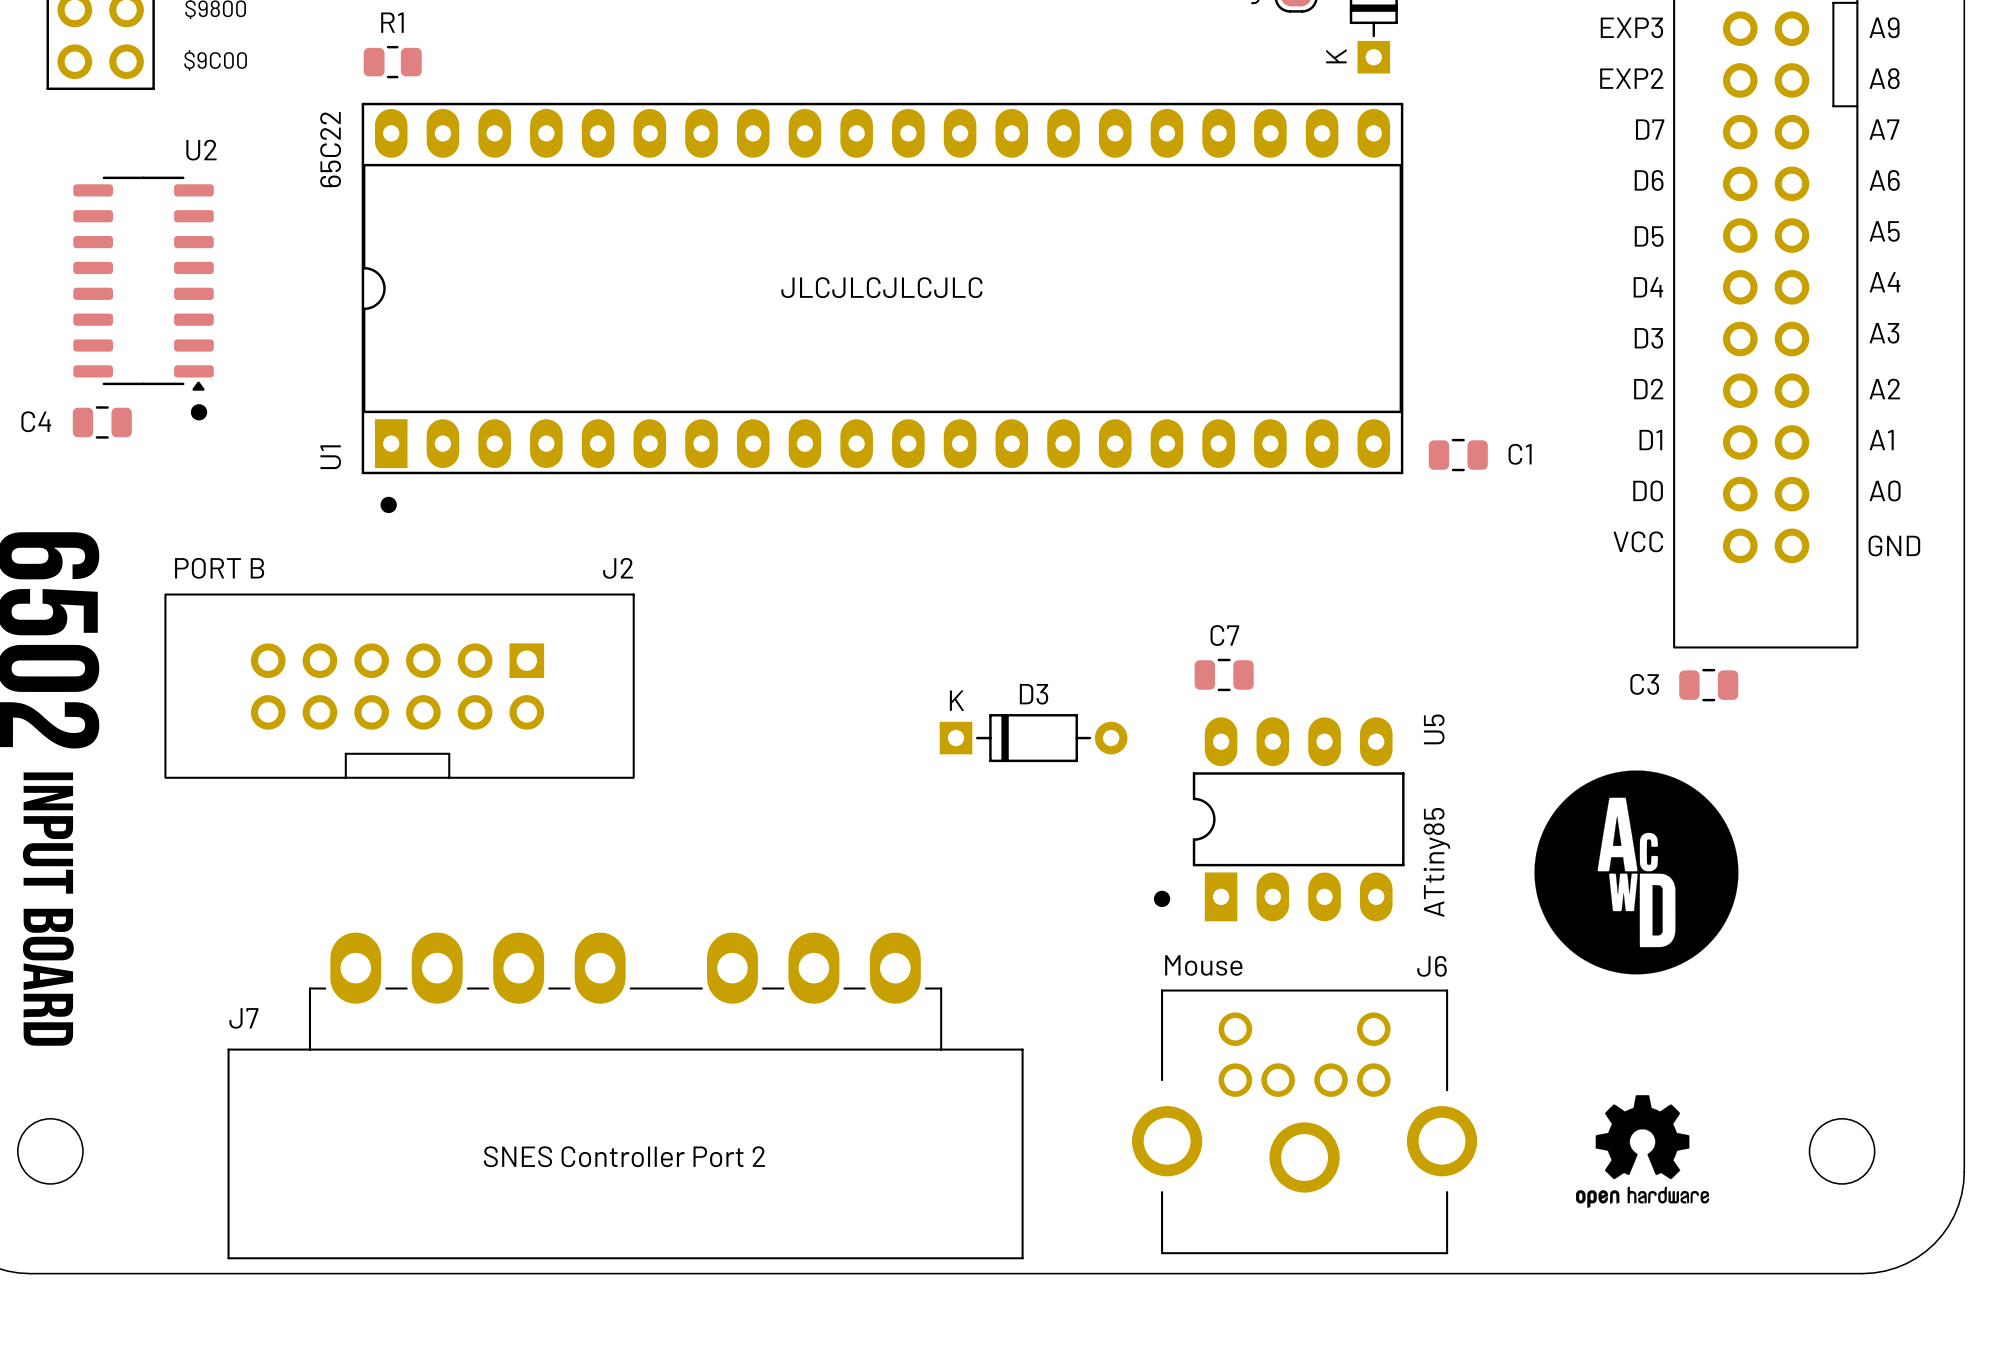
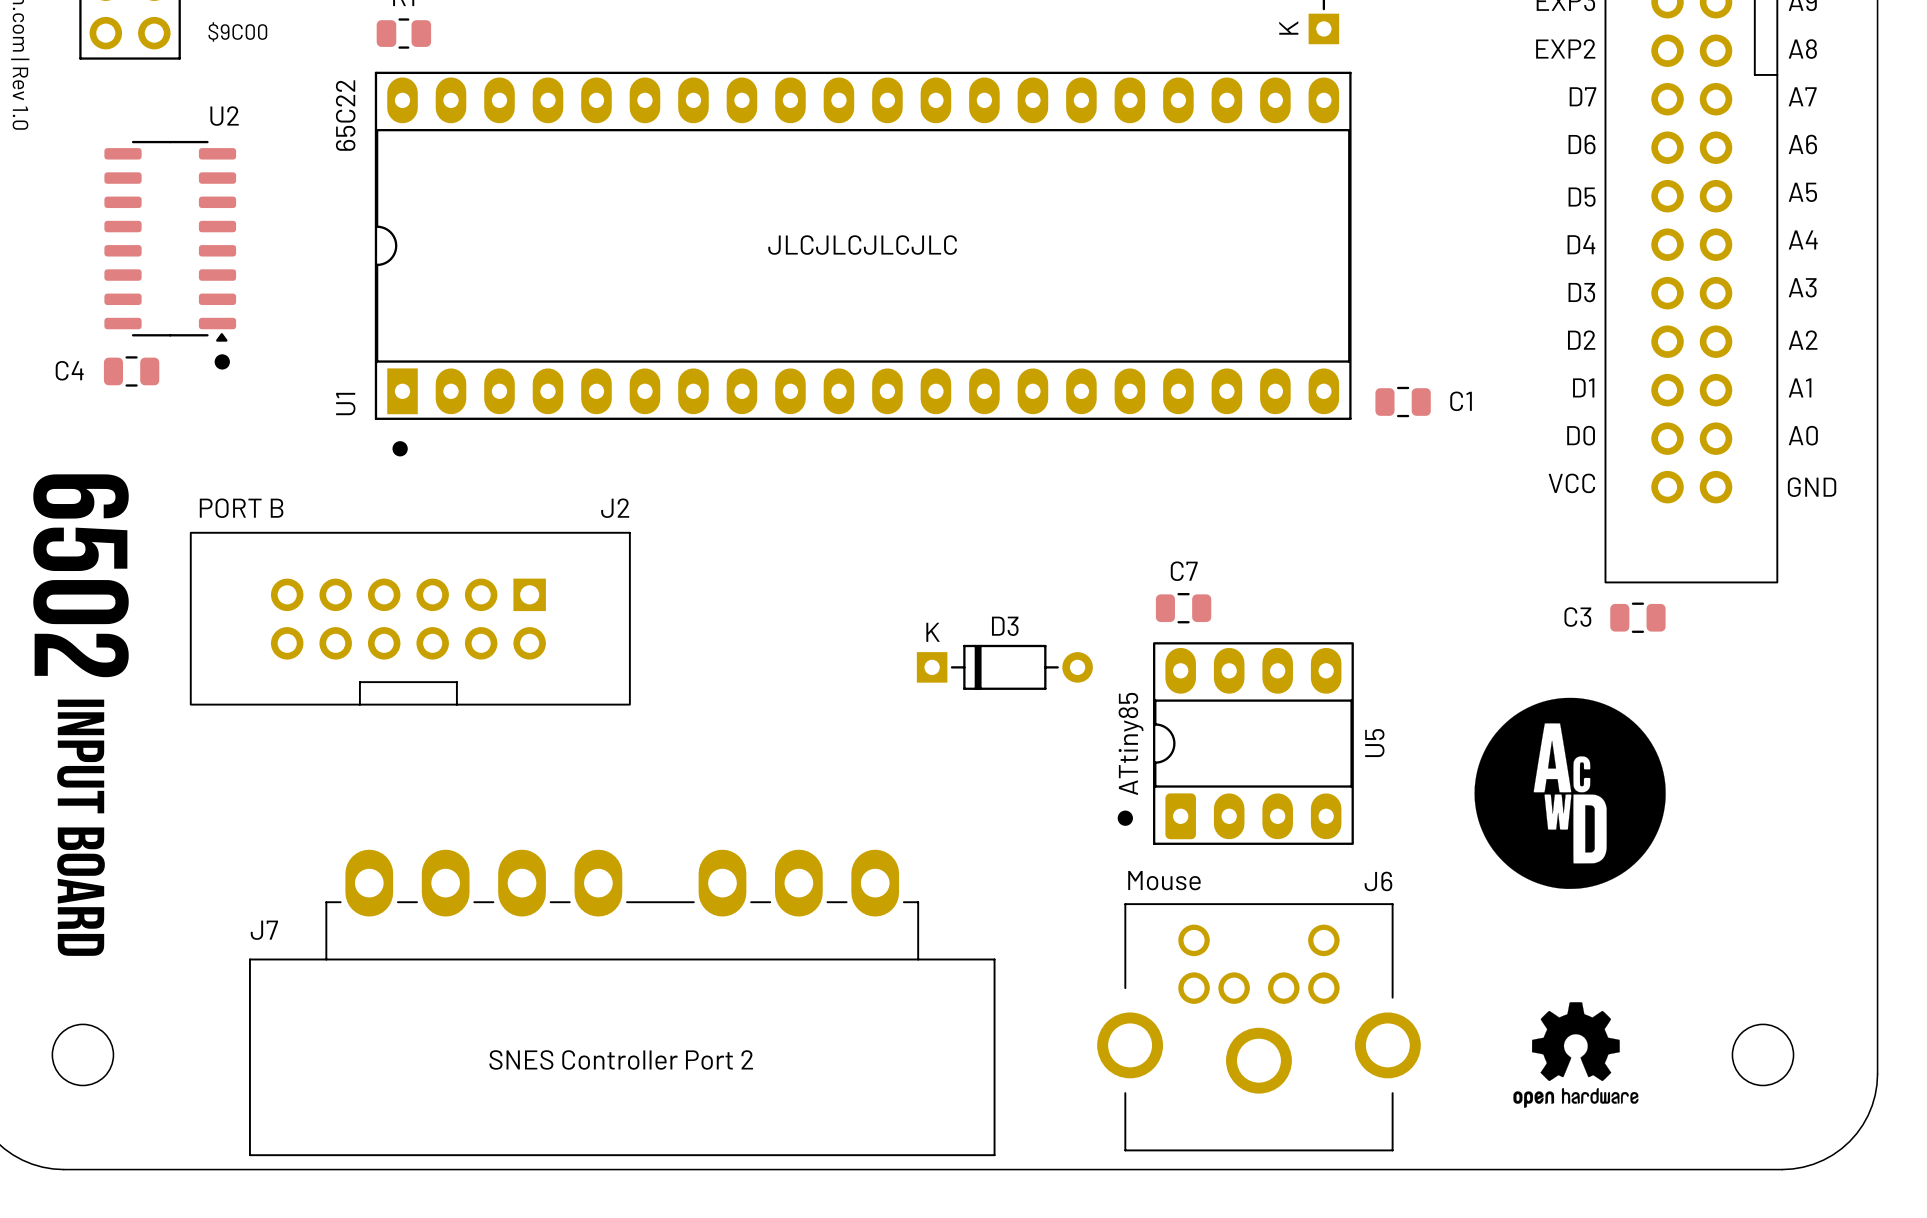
U5 footprint: [1192, 717, 1405, 922] -> [1153, 642, 1354, 845]
U5 name position: U5 (1434, 729) -> U5 (1374, 743)
U5 value position: ATtiny85 (1436, 862) -> ATtiny85 (1131, 743)

